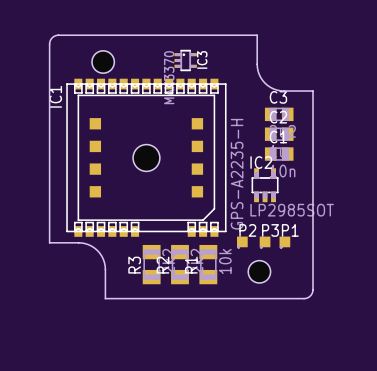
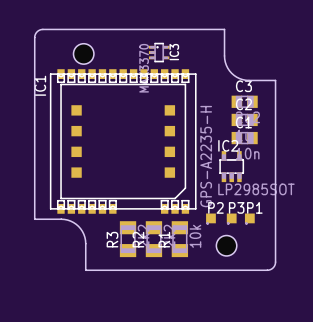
hole: (146, 157) -> none

